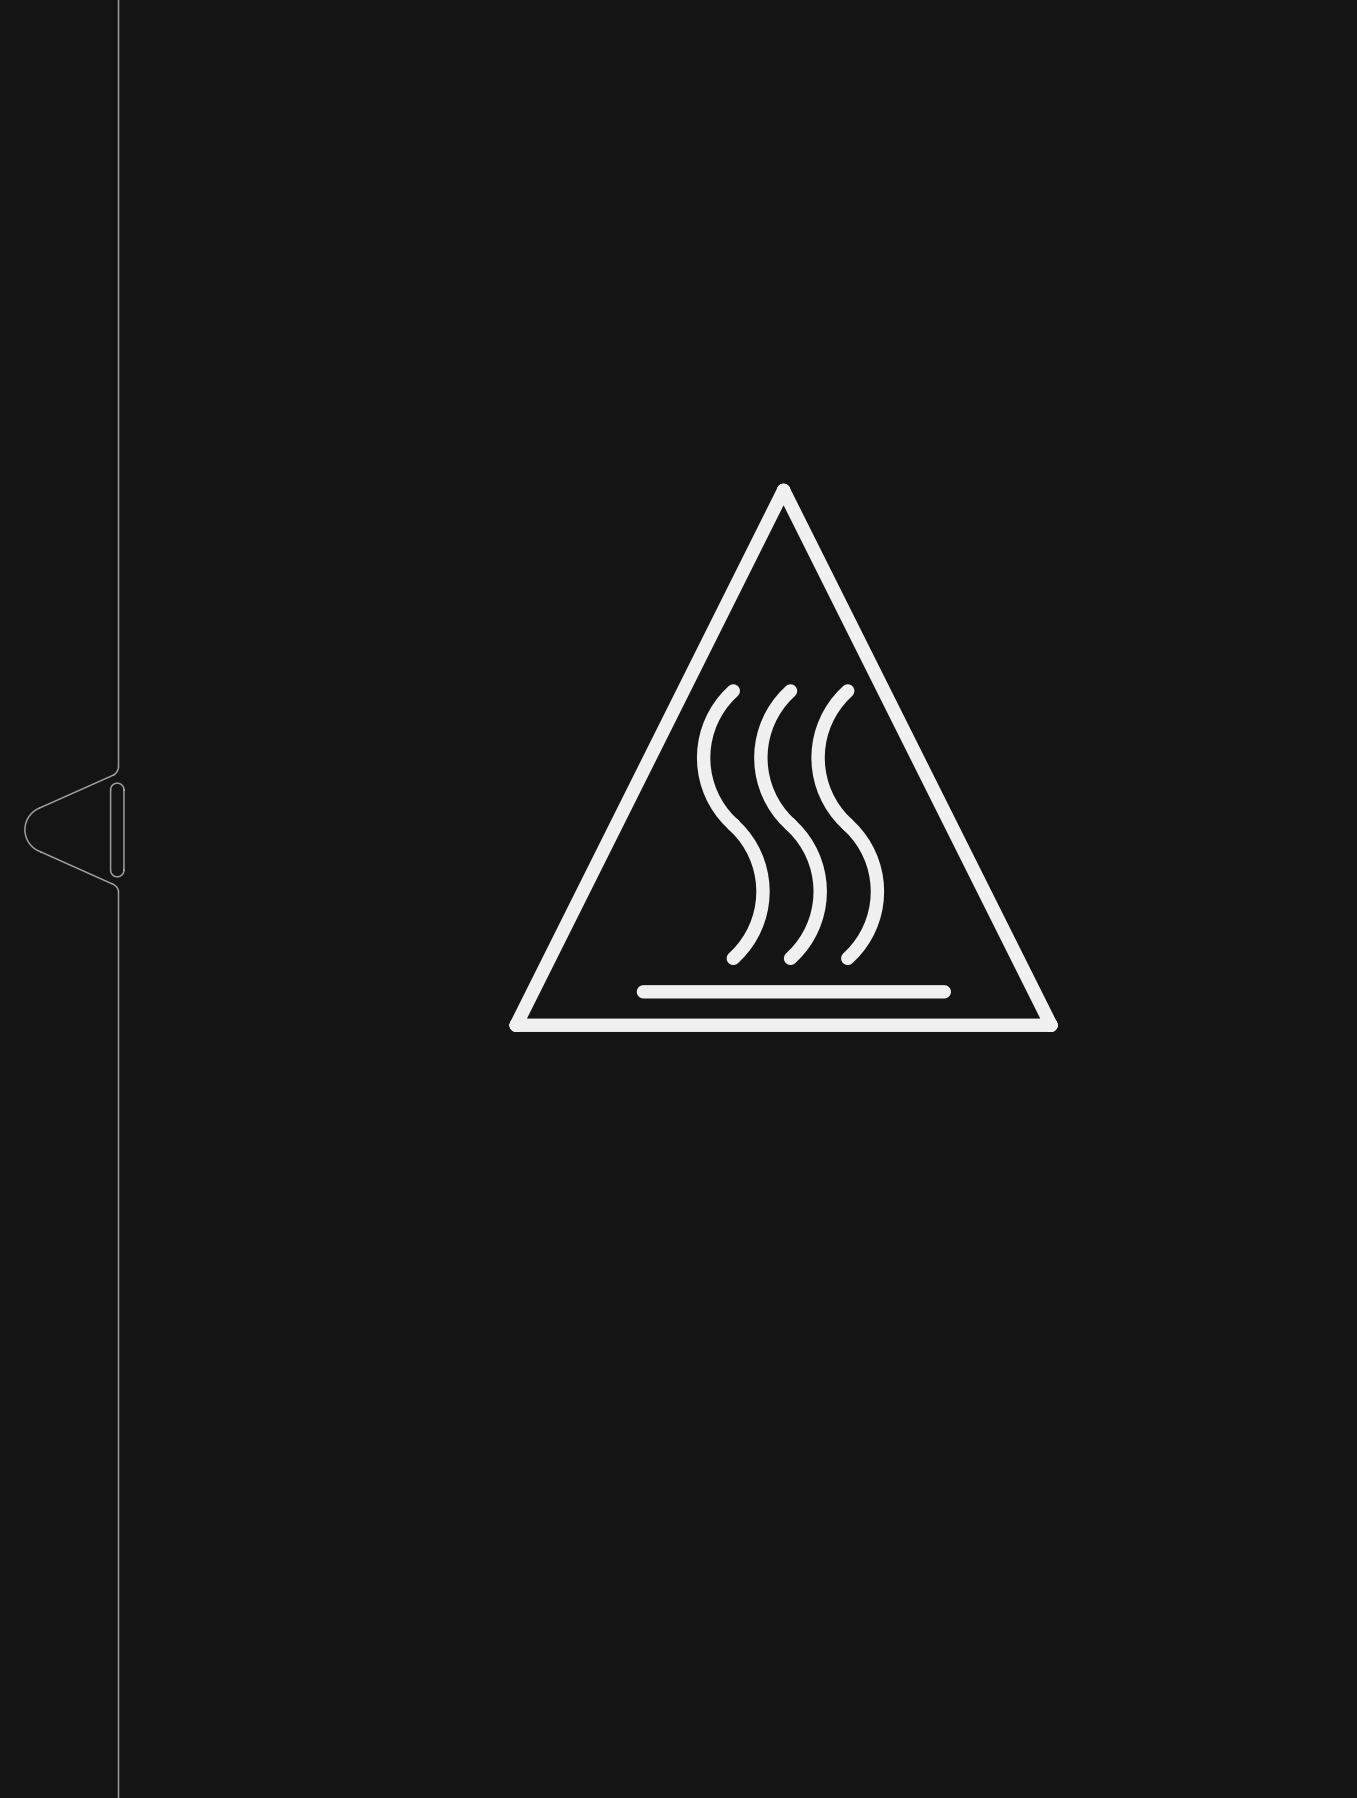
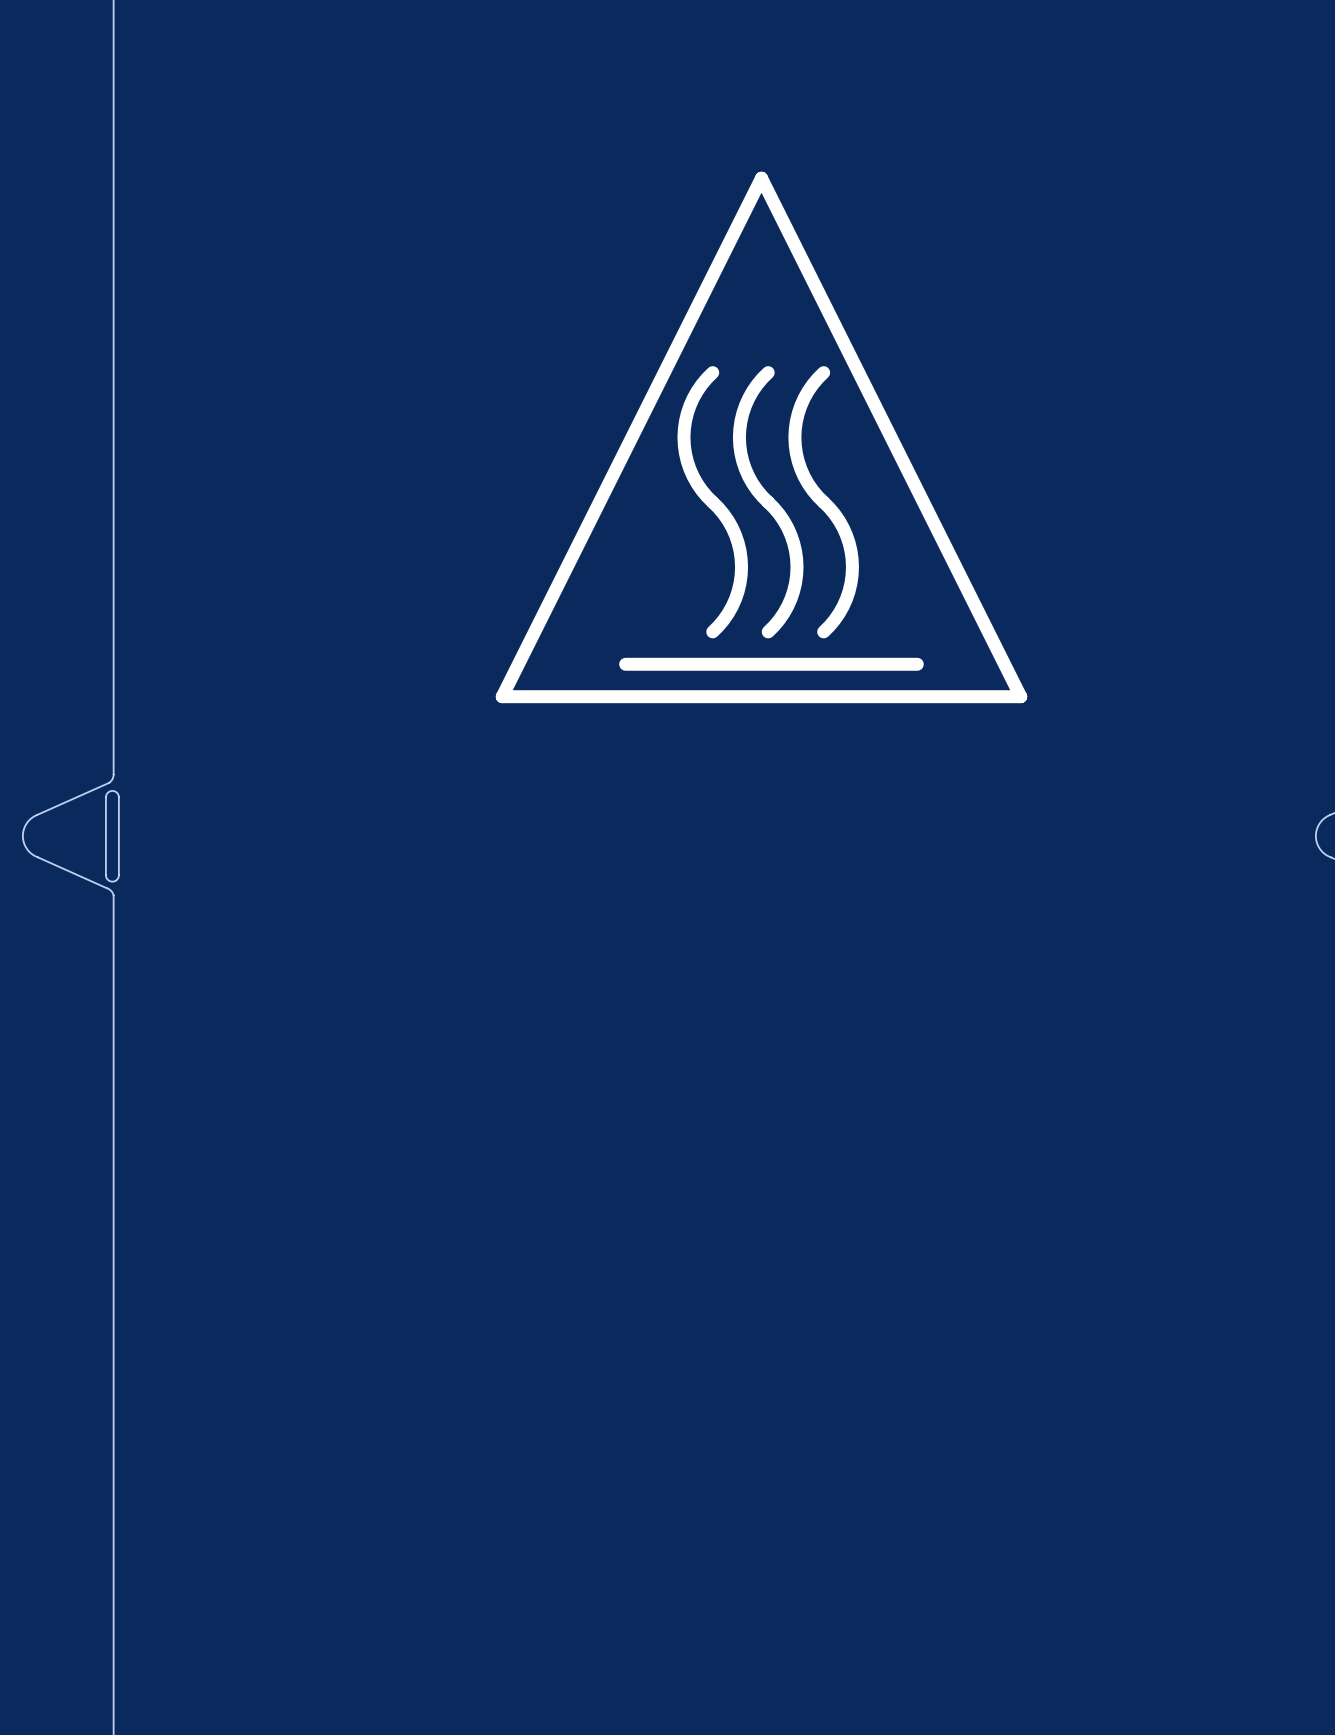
line: none -> (761, 178) (502, 696) (1020, 696) (761, 178)
line: none -> (712, 372) (701, 384) (689, 405) (684, 429) (685, 453) (689, 469) (697, 483) (723, 514) (732, 527) (740, 550) (741, 567) (740, 583) (735, 598) (728, 613) (712, 631)
line: none -> (768, 372) (757, 384) (745, 405) (739, 429) (740, 453) (745, 469) (752, 483) (779, 514) (787, 527) (793, 543) (797, 567) (795, 583) (787, 606) (779, 619) (768, 631)
line: none -> (823, 372) (808, 391) (798, 413) (794, 437) (796, 453) (800, 469) (808, 483) (834, 514) (843, 527) (849, 543) (852, 567) (849, 591) (843, 606) (834, 619) (823, 631)
line: (783, 490) (516, 1025) (1051, 1025) (783, 490) -> none
line: none -> (625, 664) (917, 664)
line: (733, 690) (717, 710) (707, 732) (703, 757) (705, 774) (709, 790) (717, 805) (744, 836) (753, 851) (761, 874) (763, 891) (761, 908) (756, 924) (749, 939) (733, 958) -> none
line: (790, 690) (779, 703) (766, 725) (761, 749) (762, 774) (766, 790) (774, 805) (801, 836) (810, 851) (816, 866) (820, 891) (818, 908) (814, 924) (806, 939) (790, 958) -> none
line: (847, 690) (836, 703) (827, 717) (819, 741) (818, 757) (821, 782) (827, 798) (836, 812) (863, 843) (871, 858) (875, 874) (877, 899) (871, 924) (859, 946) (847, 958) -> none
line: (643, 991) (944, 991) -> none

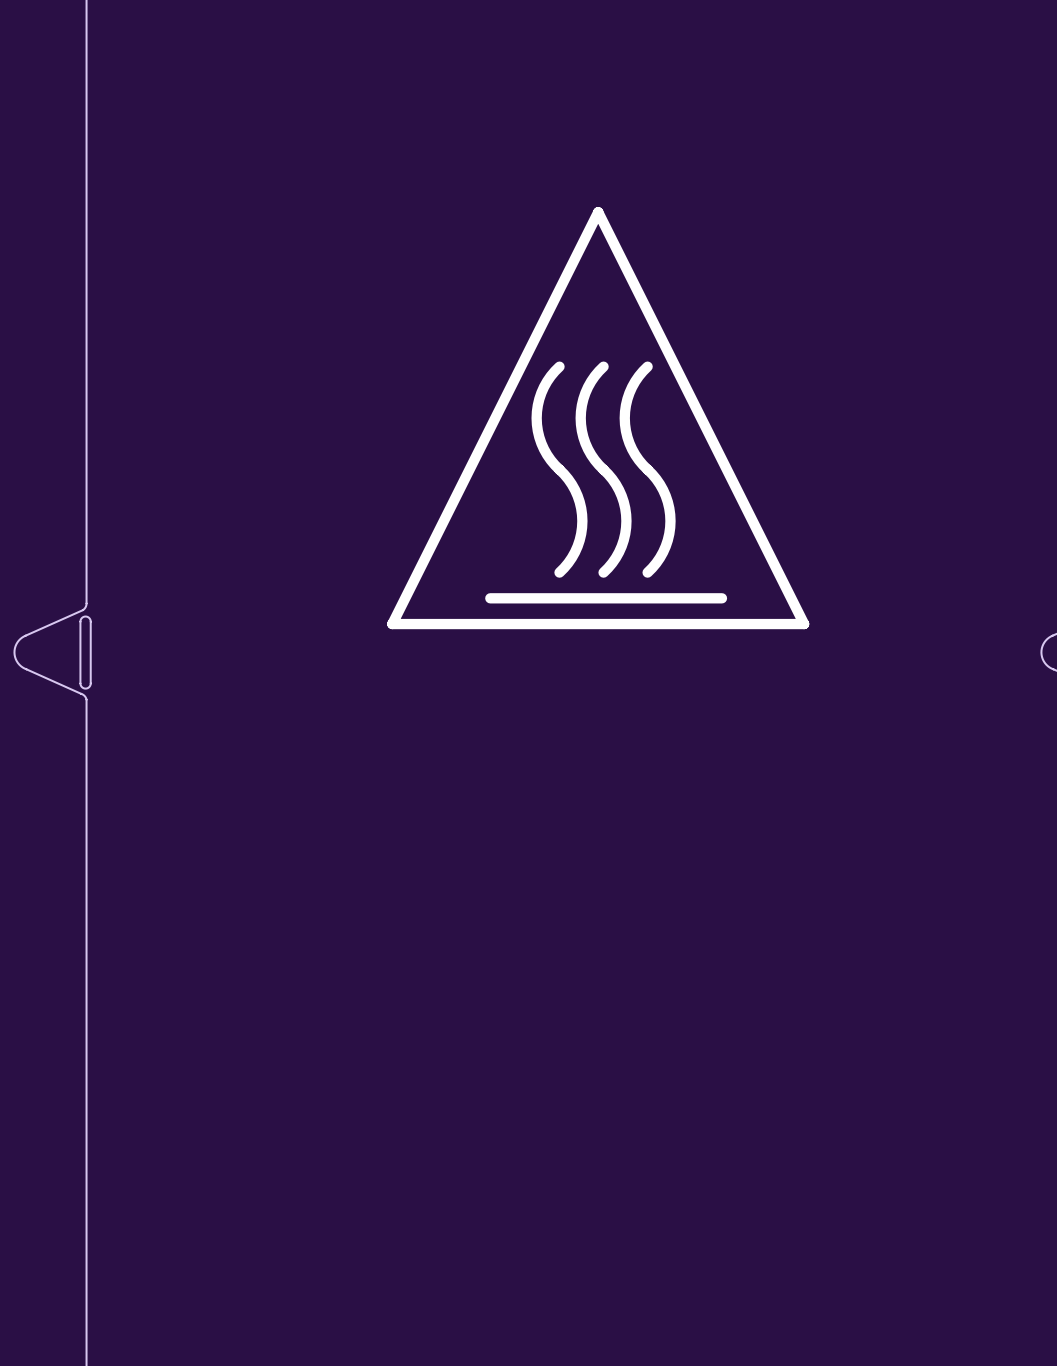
line: (761, 178) (502, 696) (1020, 696) (761, 178) -> (598, 212) (392, 624) (804, 624) (598, 212)
line: (712, 372) (701, 384) (689, 405) (684, 429) (685, 453) (689, 469) (697, 483) (723, 514) (732, 527) (740, 550) (741, 567) (740, 583) (735, 598) (728, 613) (712, 631) -> (559, 366) (547, 381) (539, 399) (536, 411) (537, 430) (547, 454) (575, 490) (581, 508) (582, 521) (577, 546) (571, 557) (559, 572)
line: (768, 372) (757, 384) (745, 405) (739, 429) (740, 453) (745, 469) (752, 483) (779, 514) (787, 527) (793, 543) (797, 567) (795, 583) (787, 606) (779, 619) (768, 631) -> (603, 366) (591, 381) (583, 399) (580, 418) (581, 430) (591, 454) (619, 490) (625, 508) (626, 521) (623, 540) (619, 552) (603, 572)
line: (823, 372) (808, 391) (798, 413) (794, 437) (796, 453) (800, 469) (808, 483) (834, 514) (843, 527) (849, 543) (852, 567) (849, 591) (843, 606) (834, 619) (823, 631) -> (647, 366) (635, 381) (629, 392) (624, 418) (625, 430) (632, 449) (659, 484) (669, 508) (670, 527) (667, 540) (659, 557) (647, 572)
line: (625, 664) (917, 664) -> (490, 598) (721, 598)

